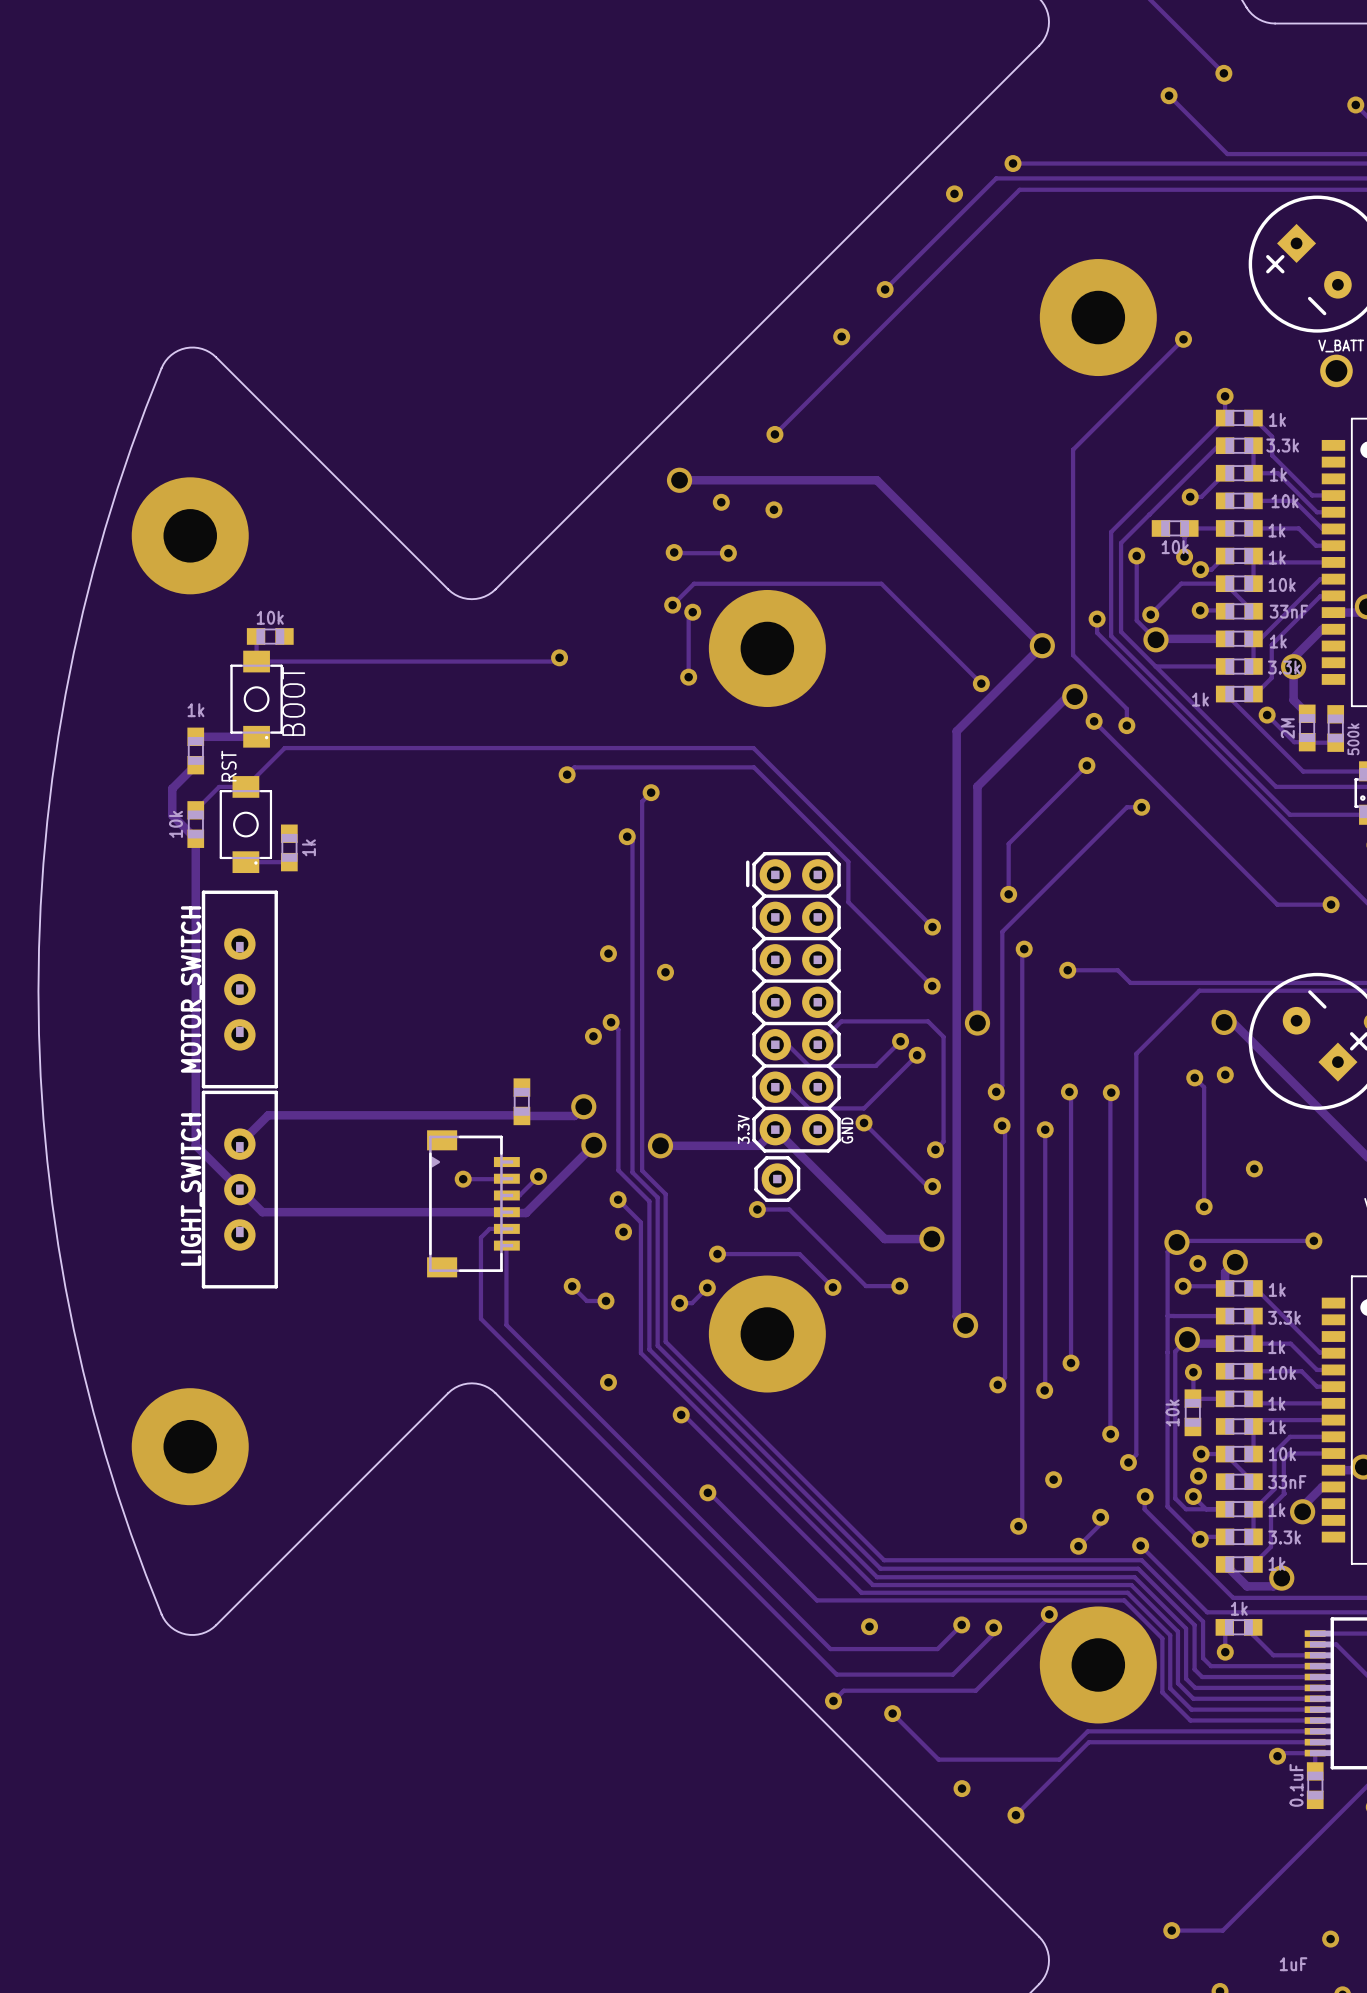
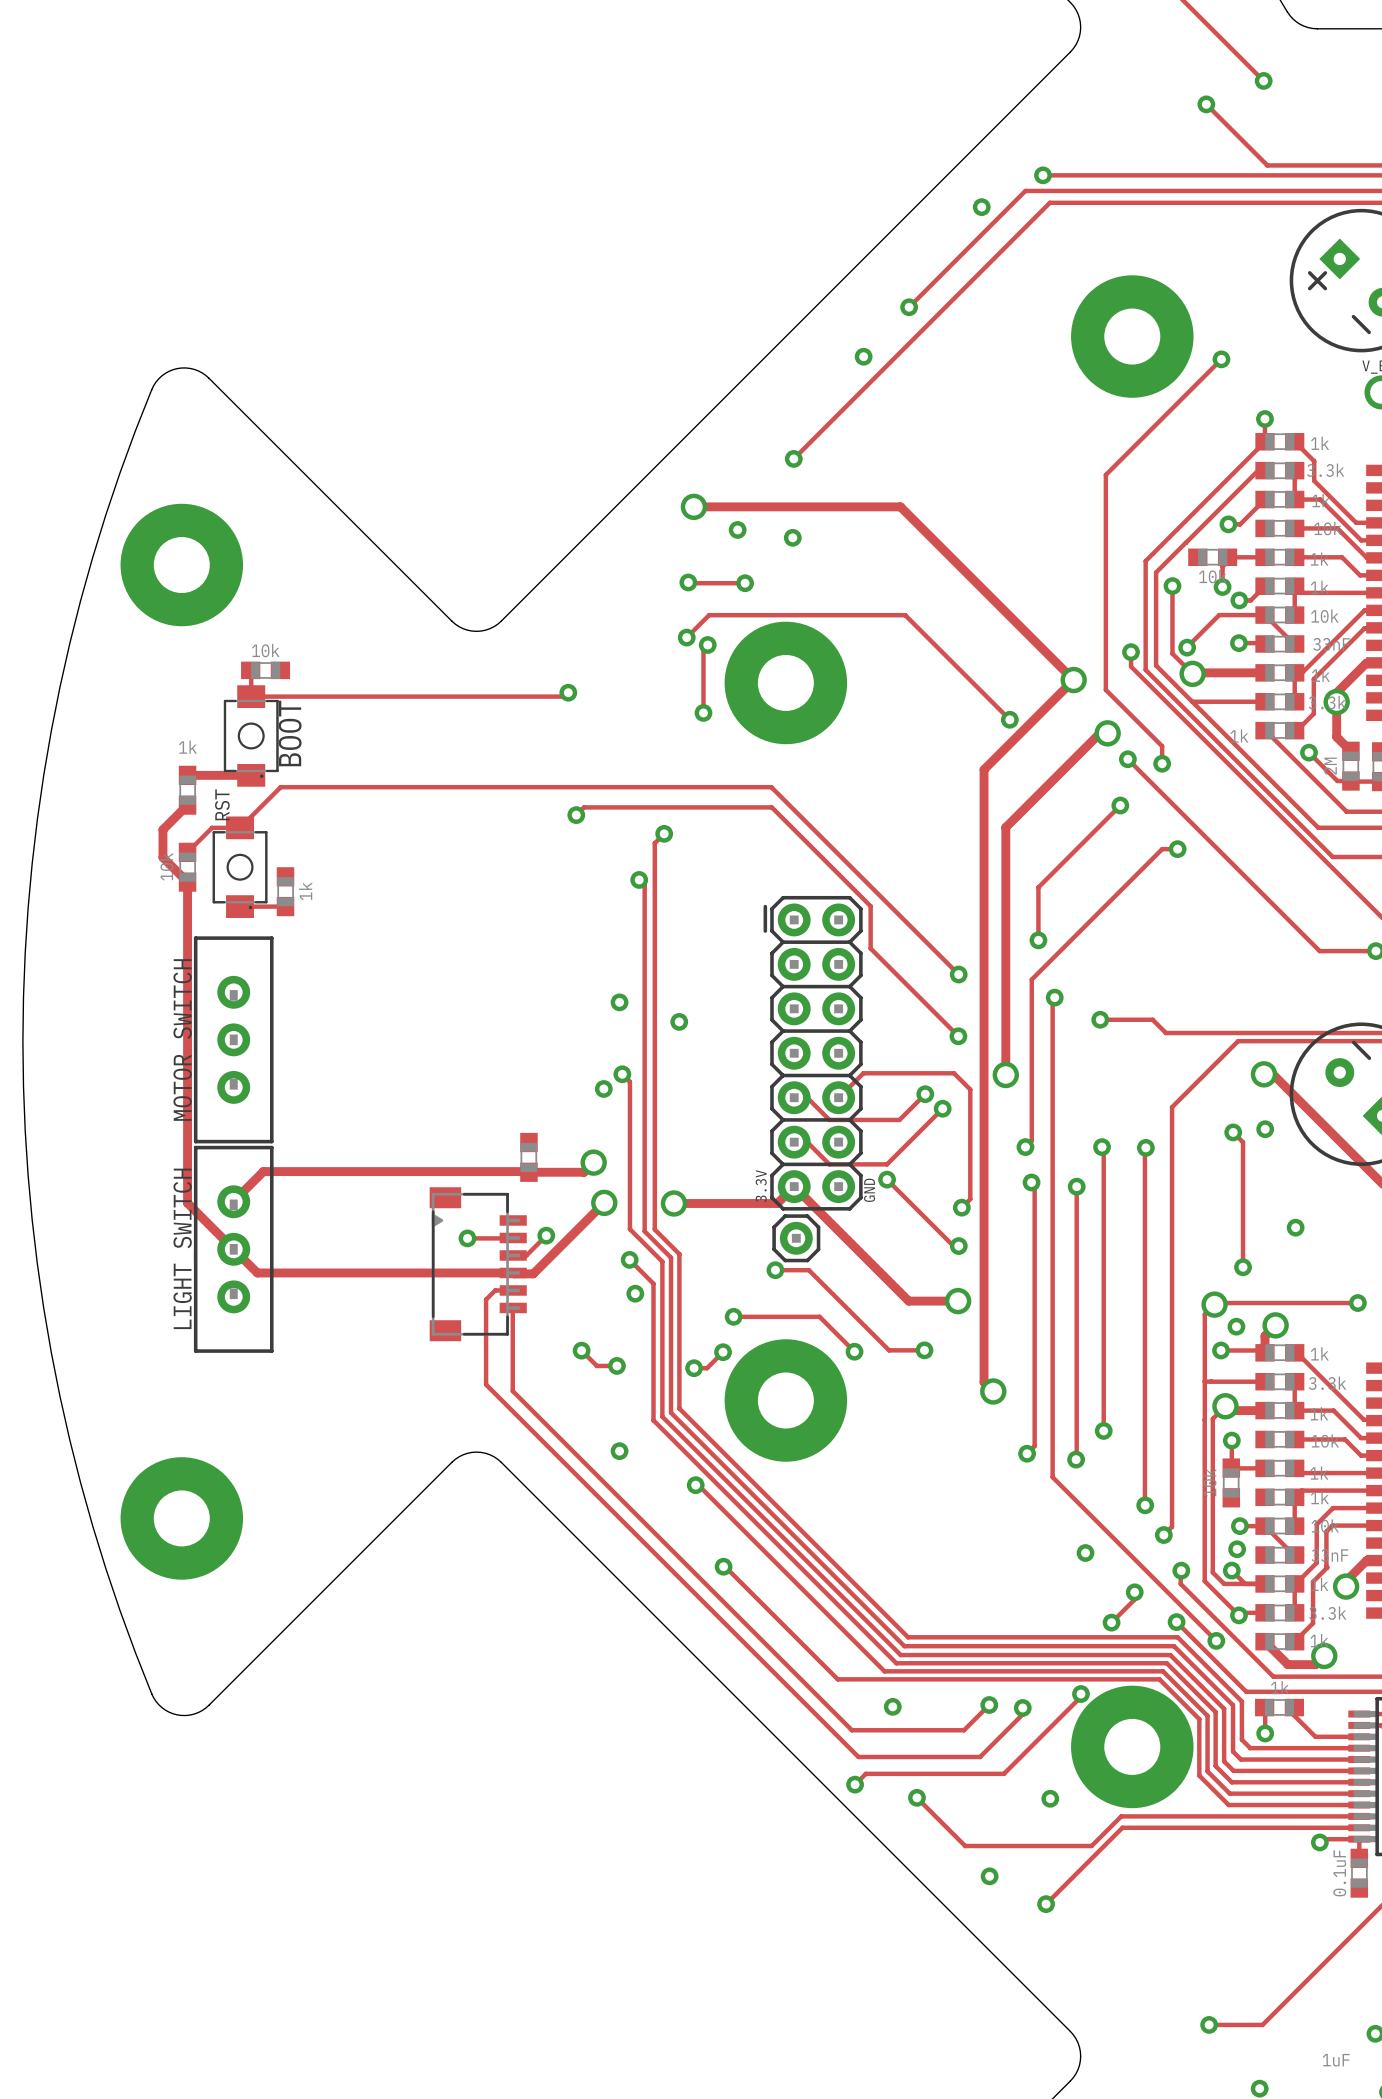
track: (1022, 1407) (1022, 1522) (1018, 1526) -> (1052, 1477) (1216, 1640)
via: (1018, 1526) -> none
via: none -> (1216, 1640)
via: none -> (1050, 1798)

